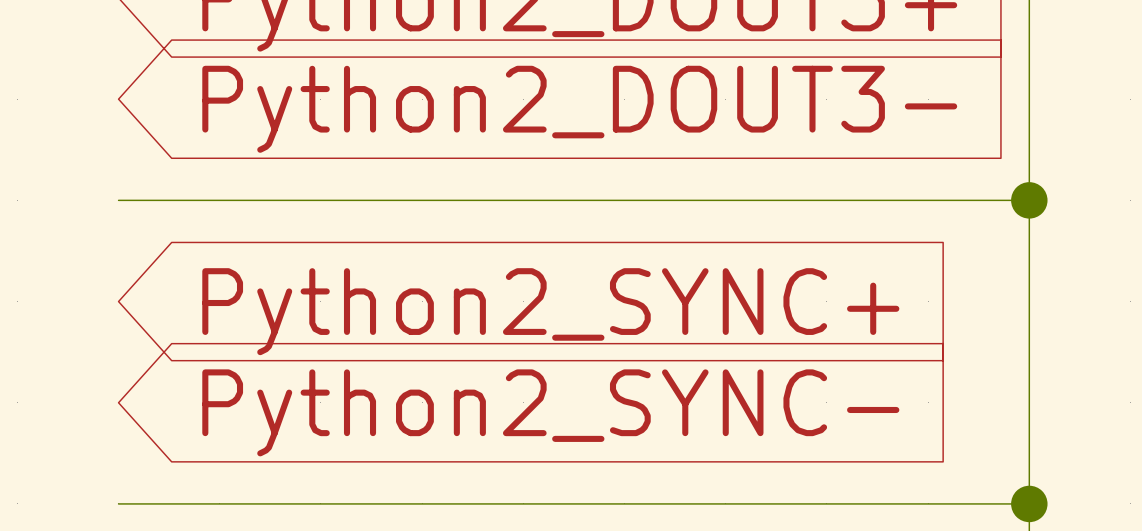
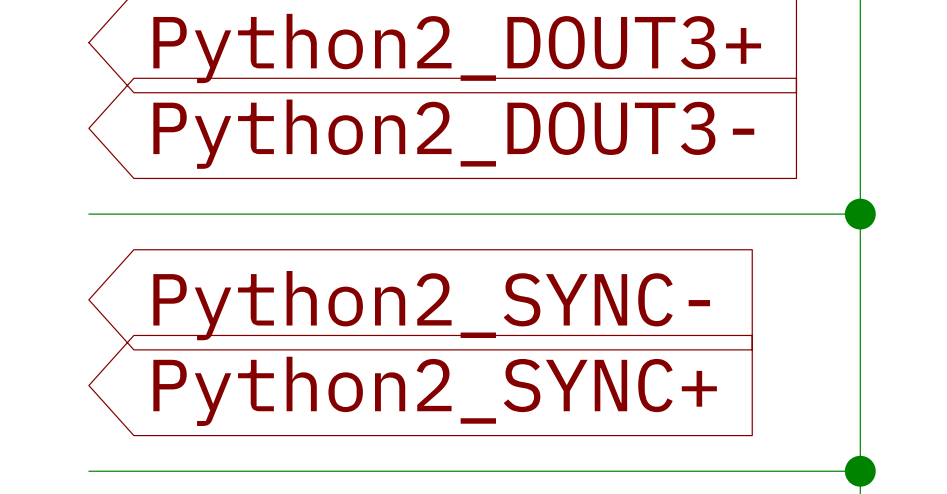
global label: Python2_SYNC+ (550, 311) -> Python2_SYNC- (431, 305)
global label: Python2_SYNC- (550, 412) -> Python2_SYNC+ (435, 391)

